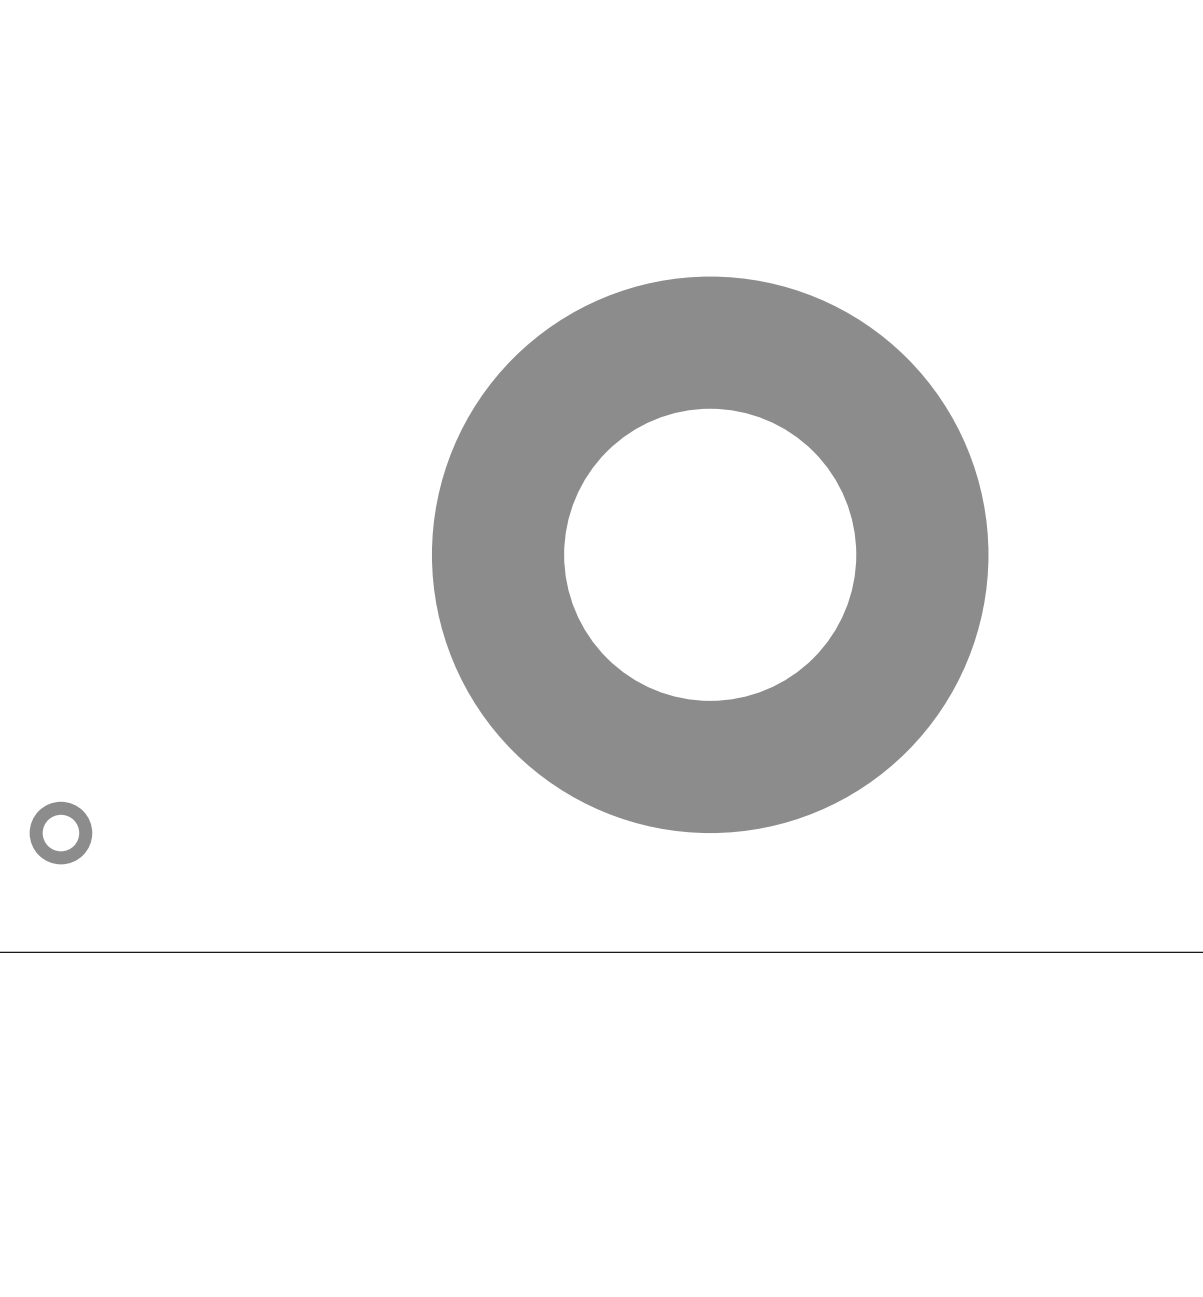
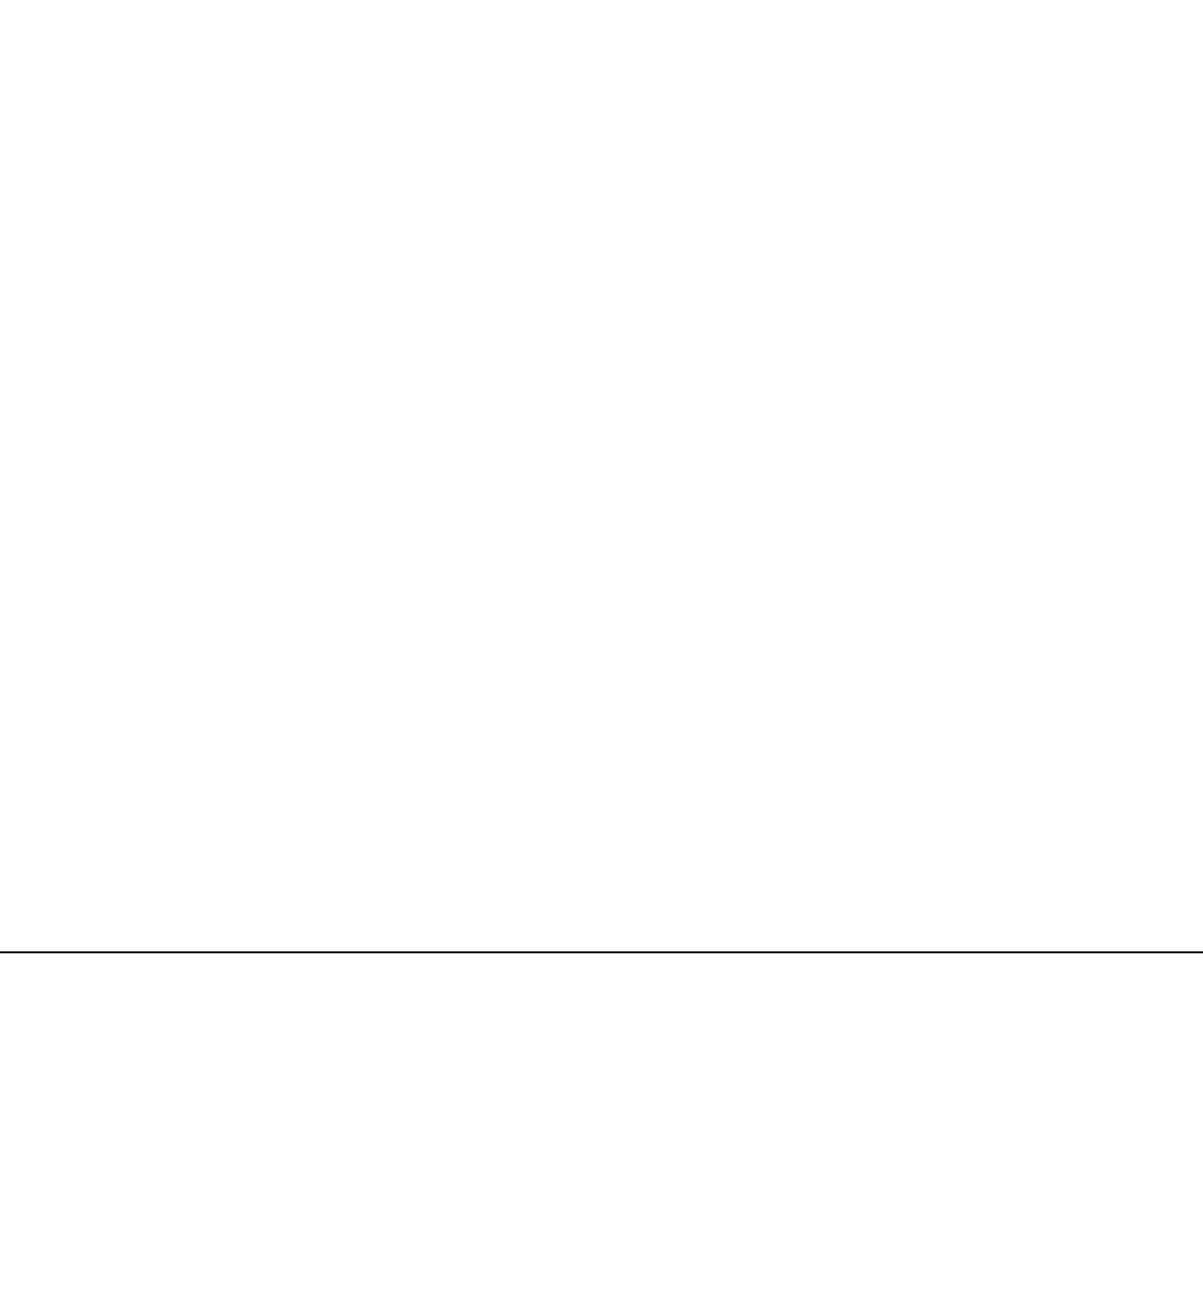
part: (710, 554) -> none
via: (60, 833) -> none

